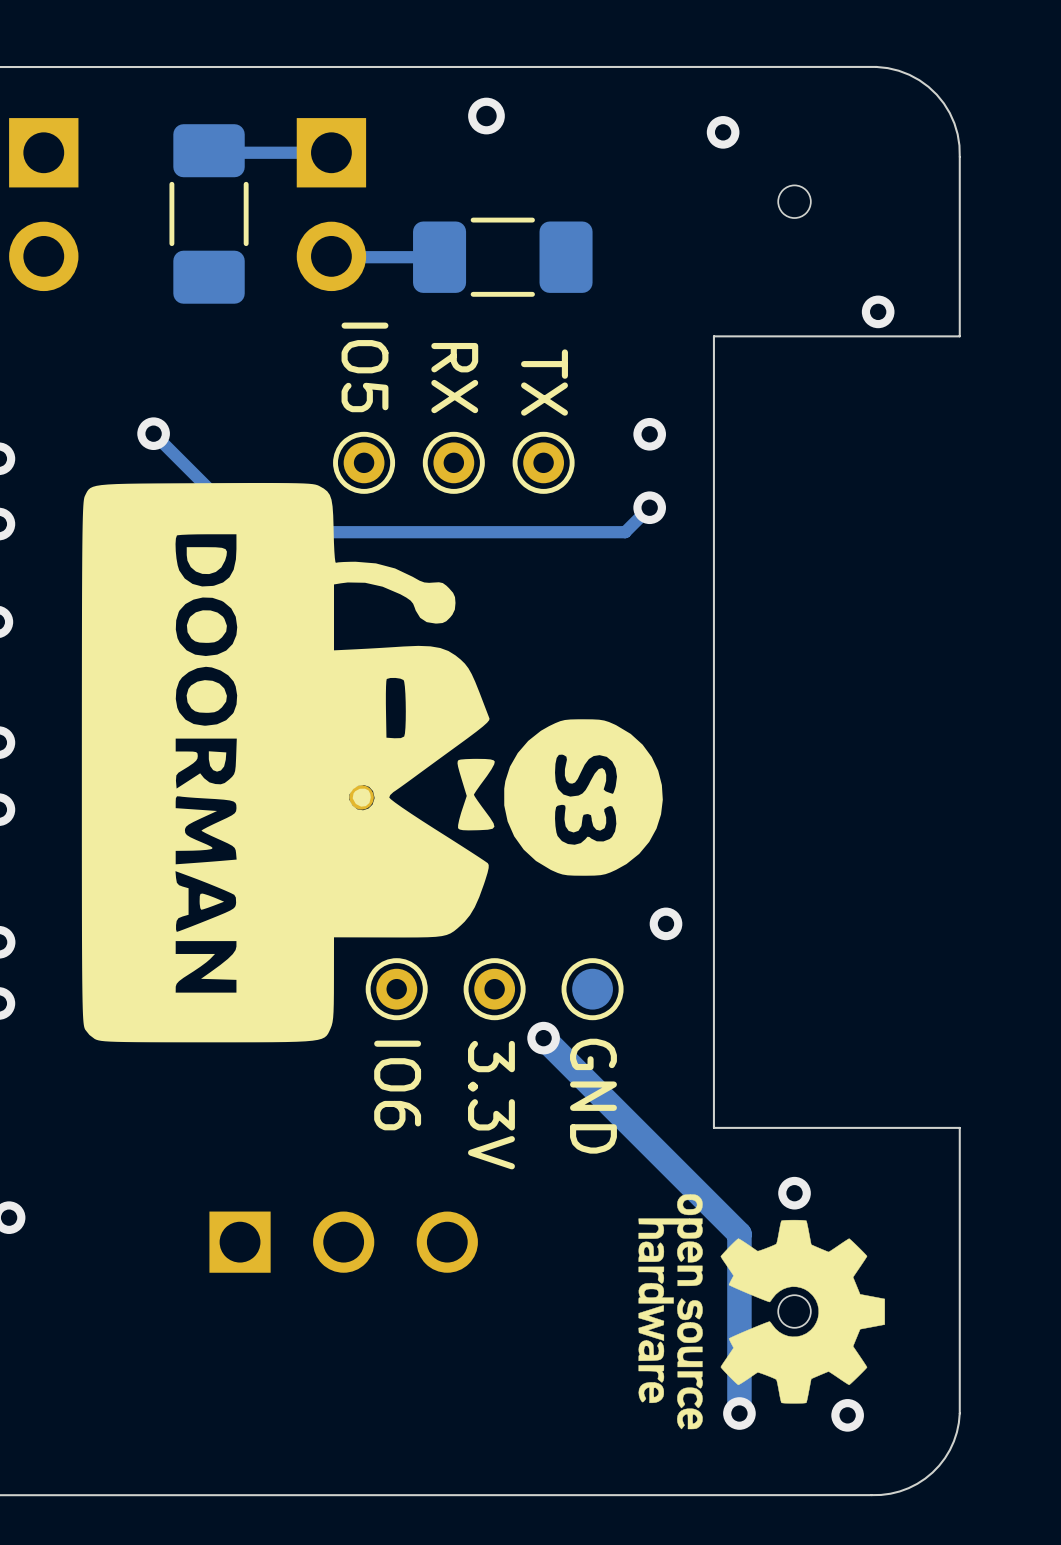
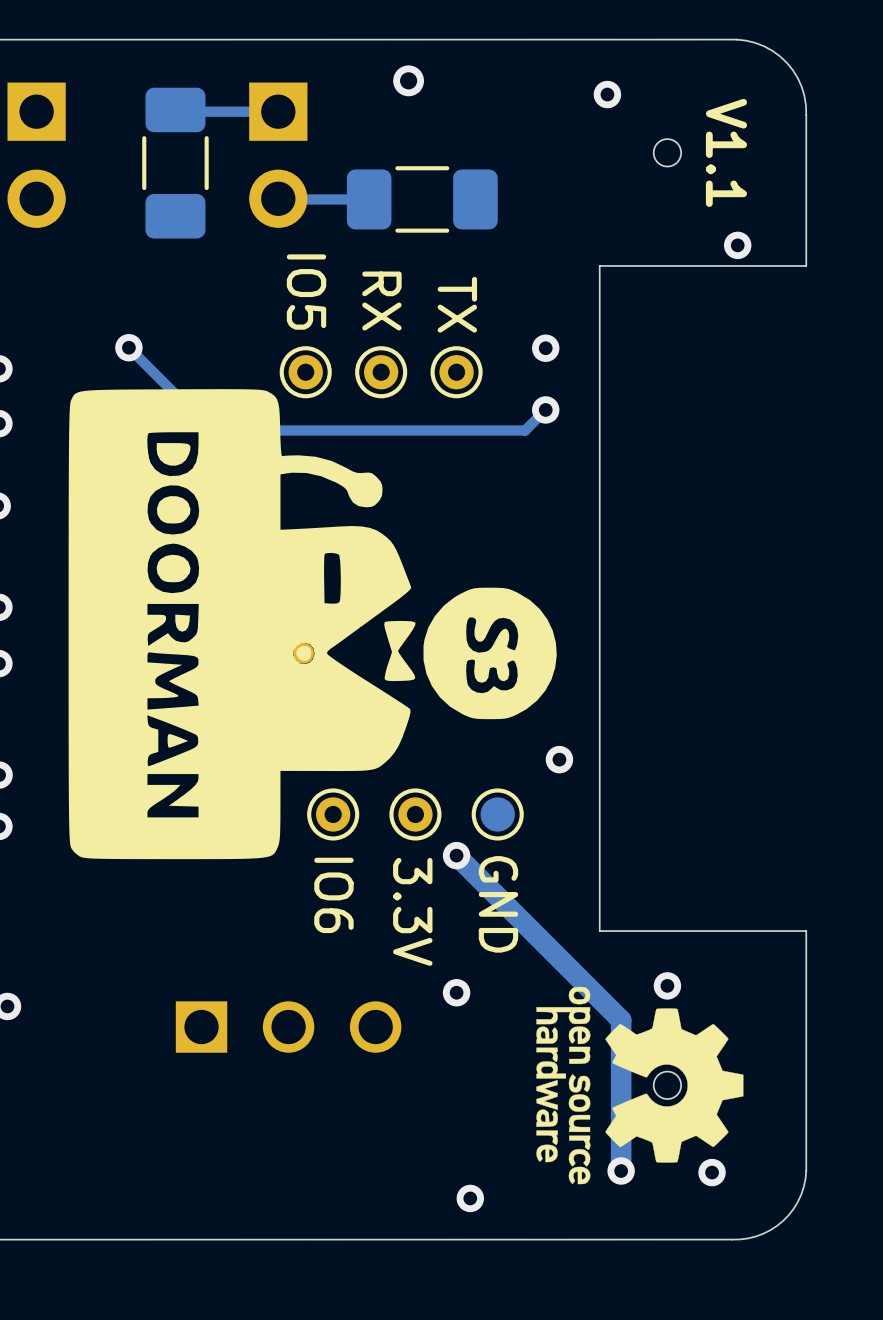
text: none -> V1.1 (726, 152)
via: none -> (456, 992)
via: none -> (470, 1198)

